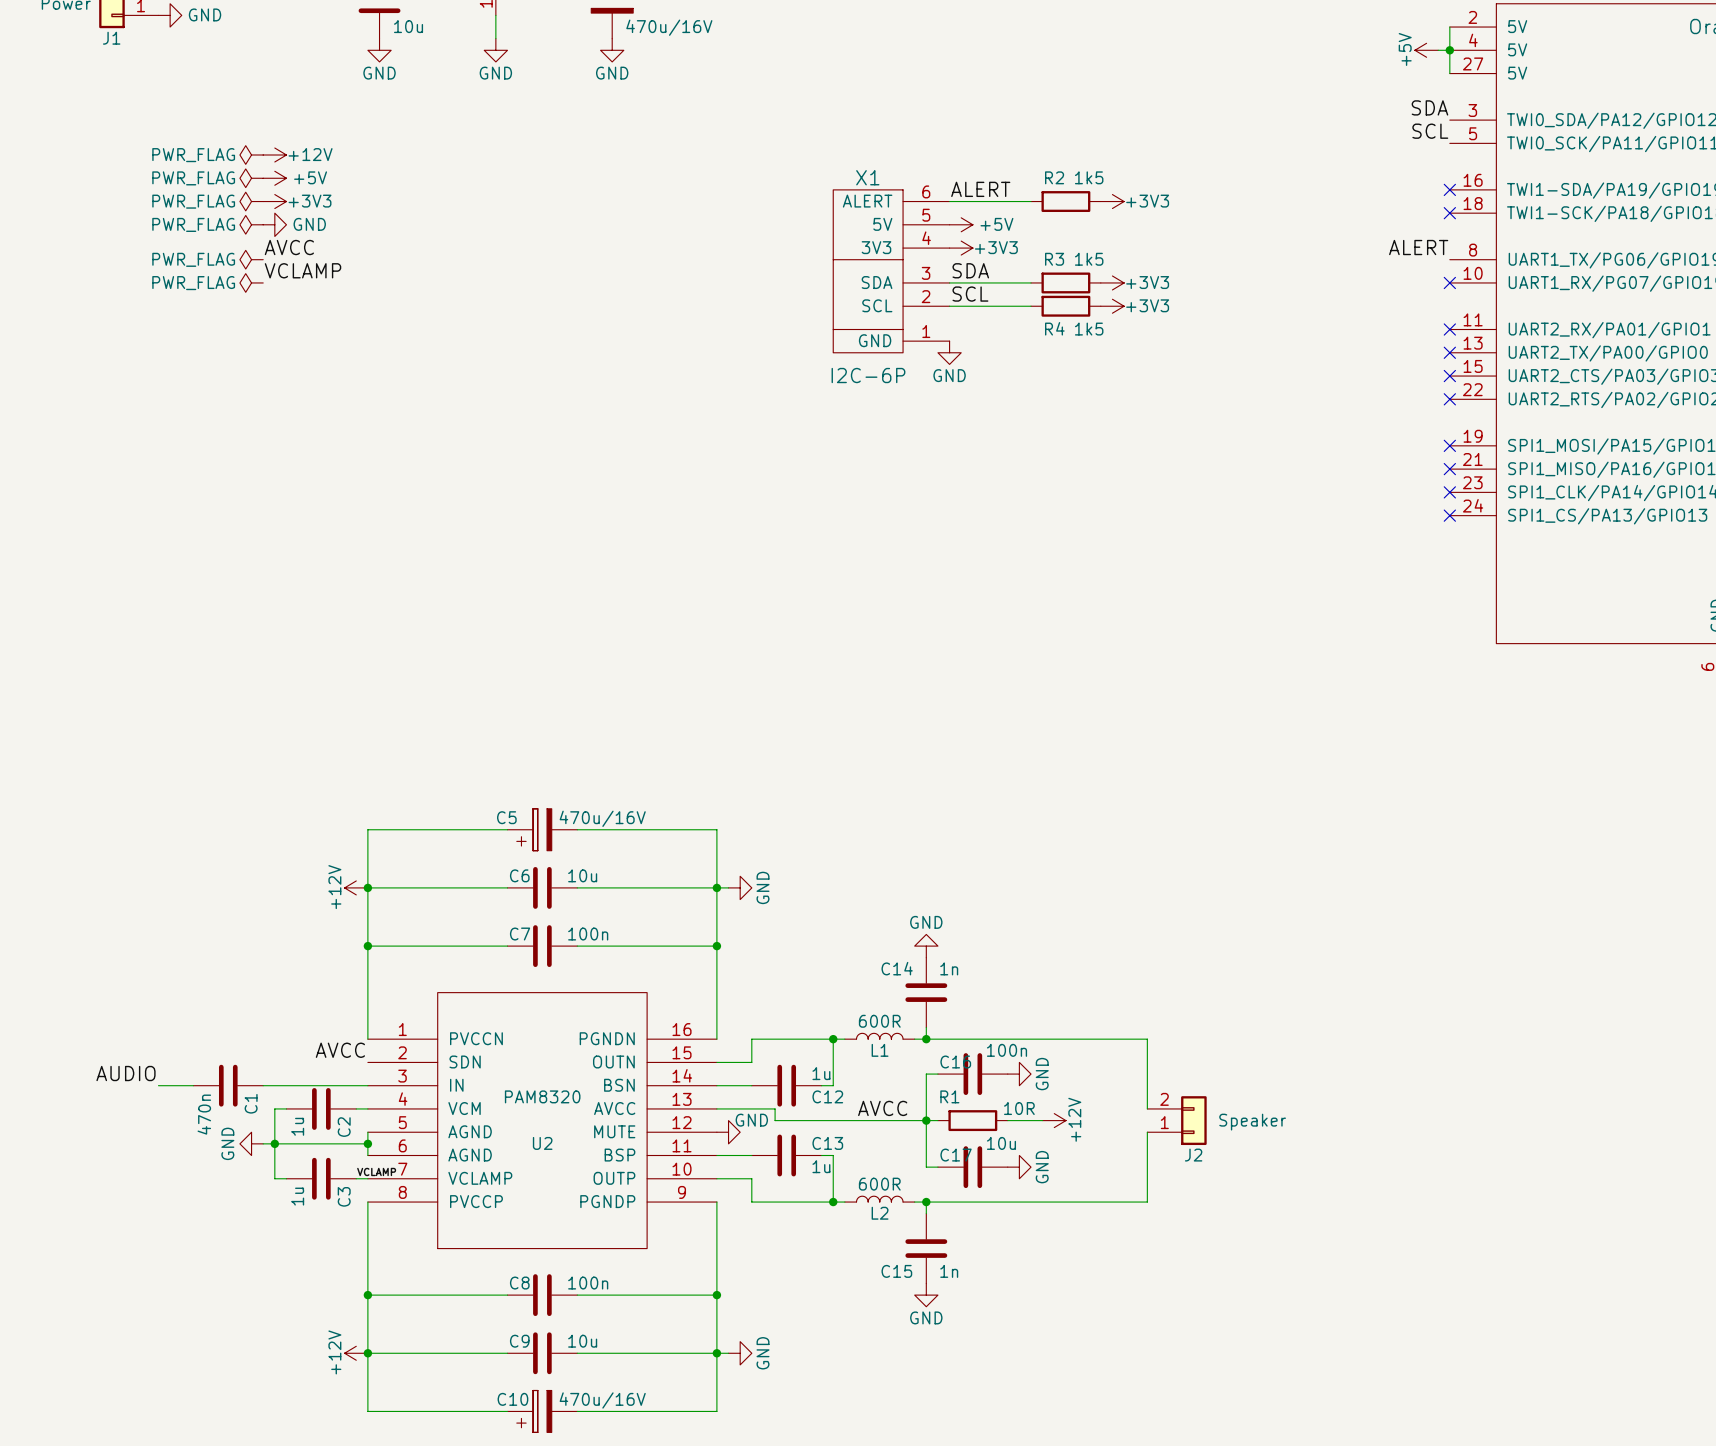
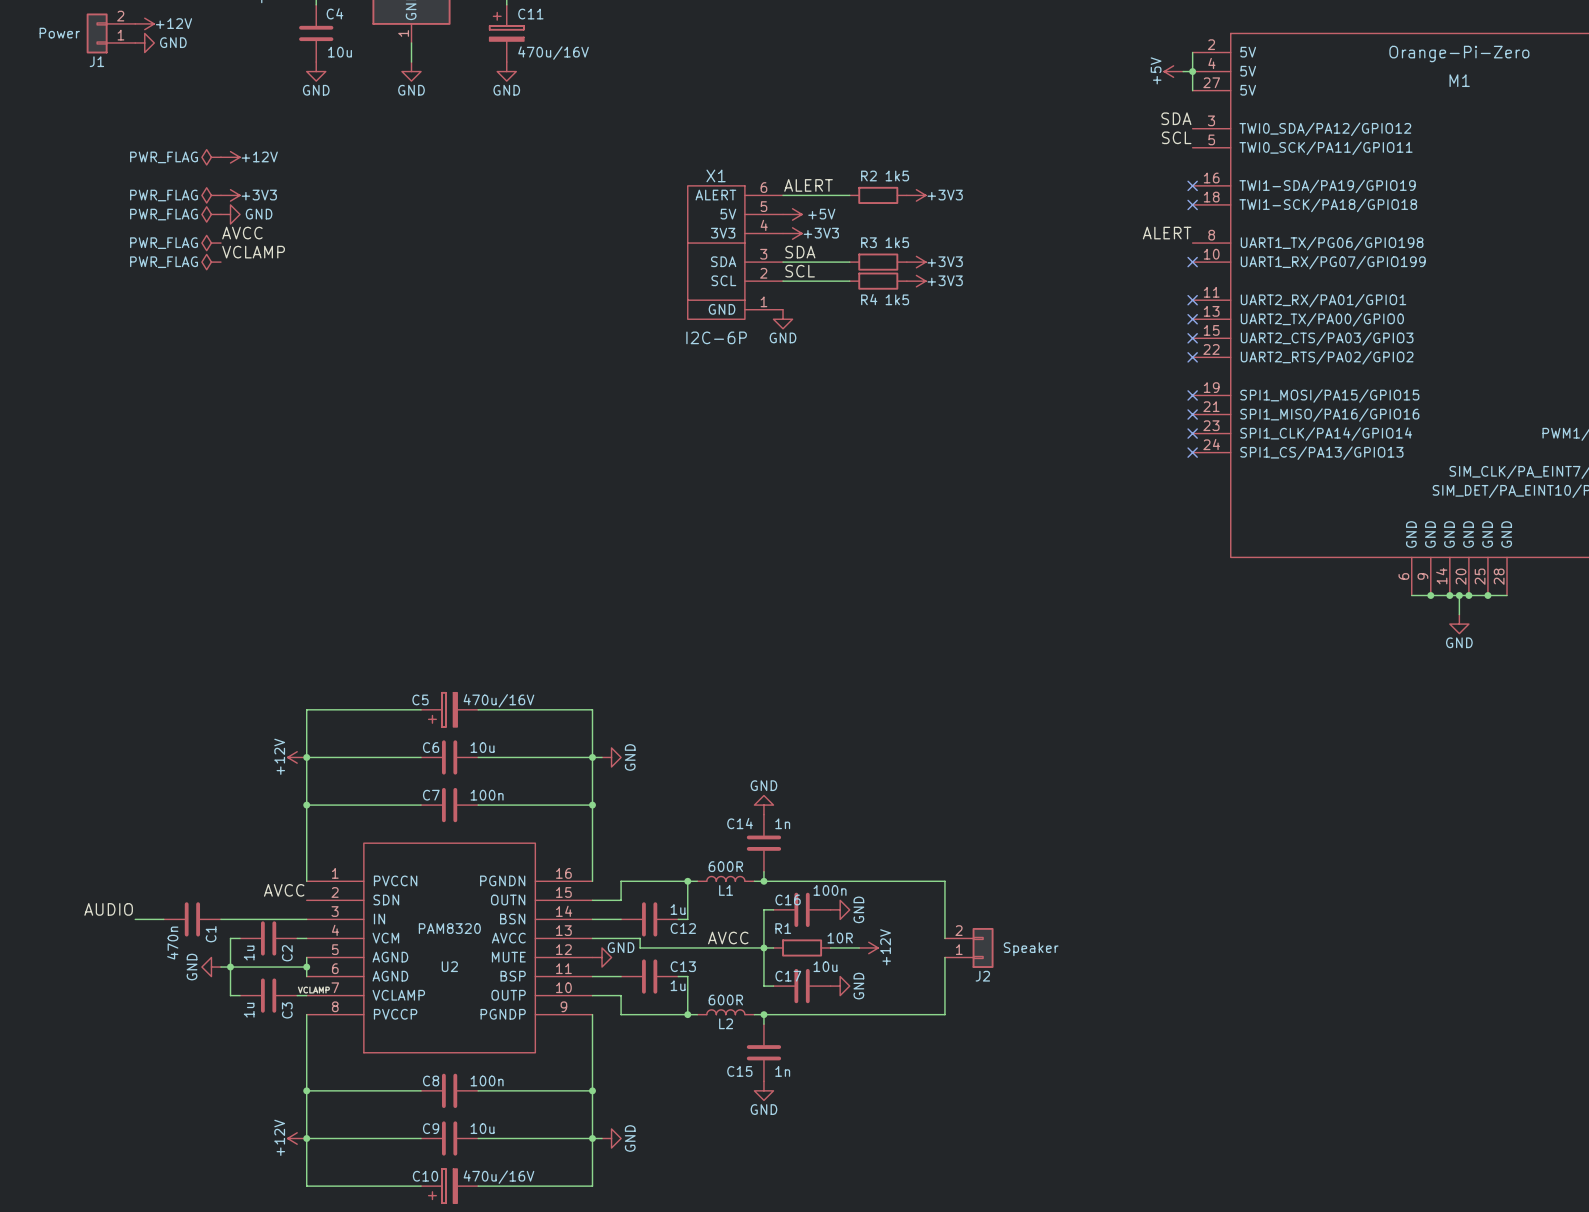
power symbol: PWR_FLAG (251, 178) -> none
power symbol: +5V (274, 178) -> none

